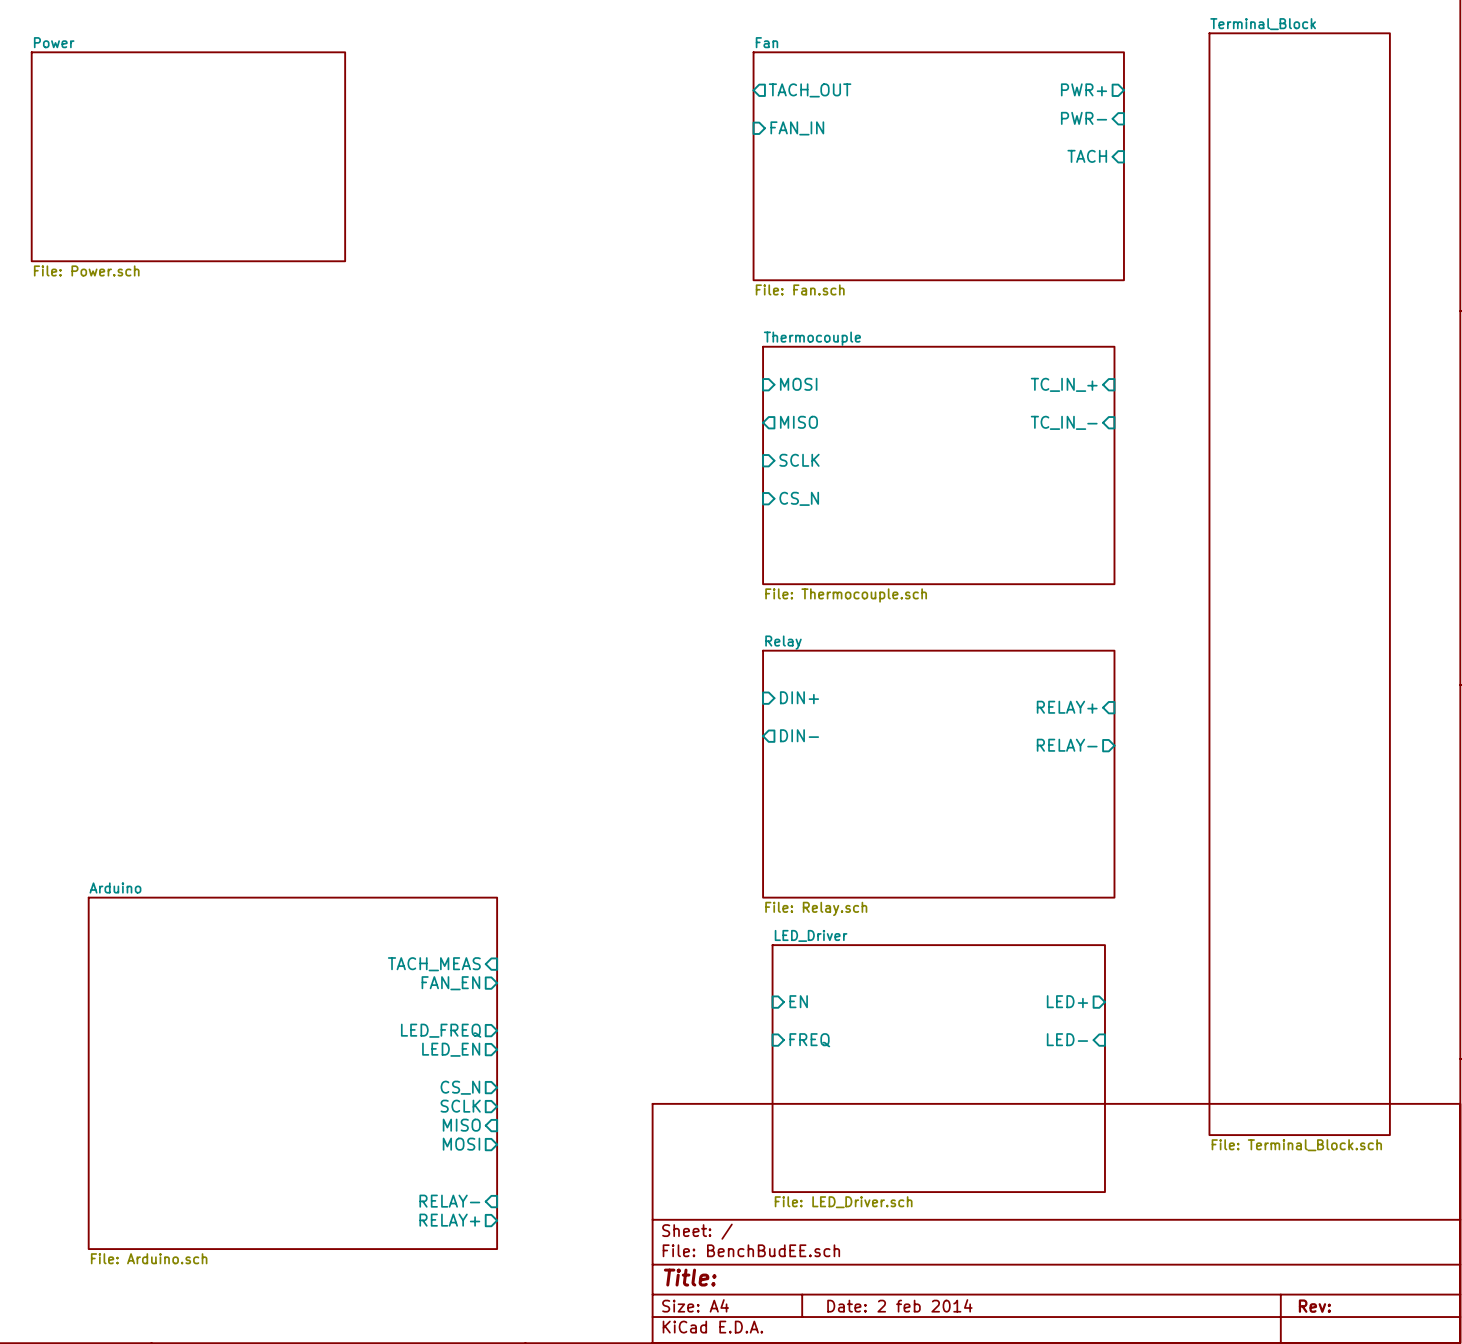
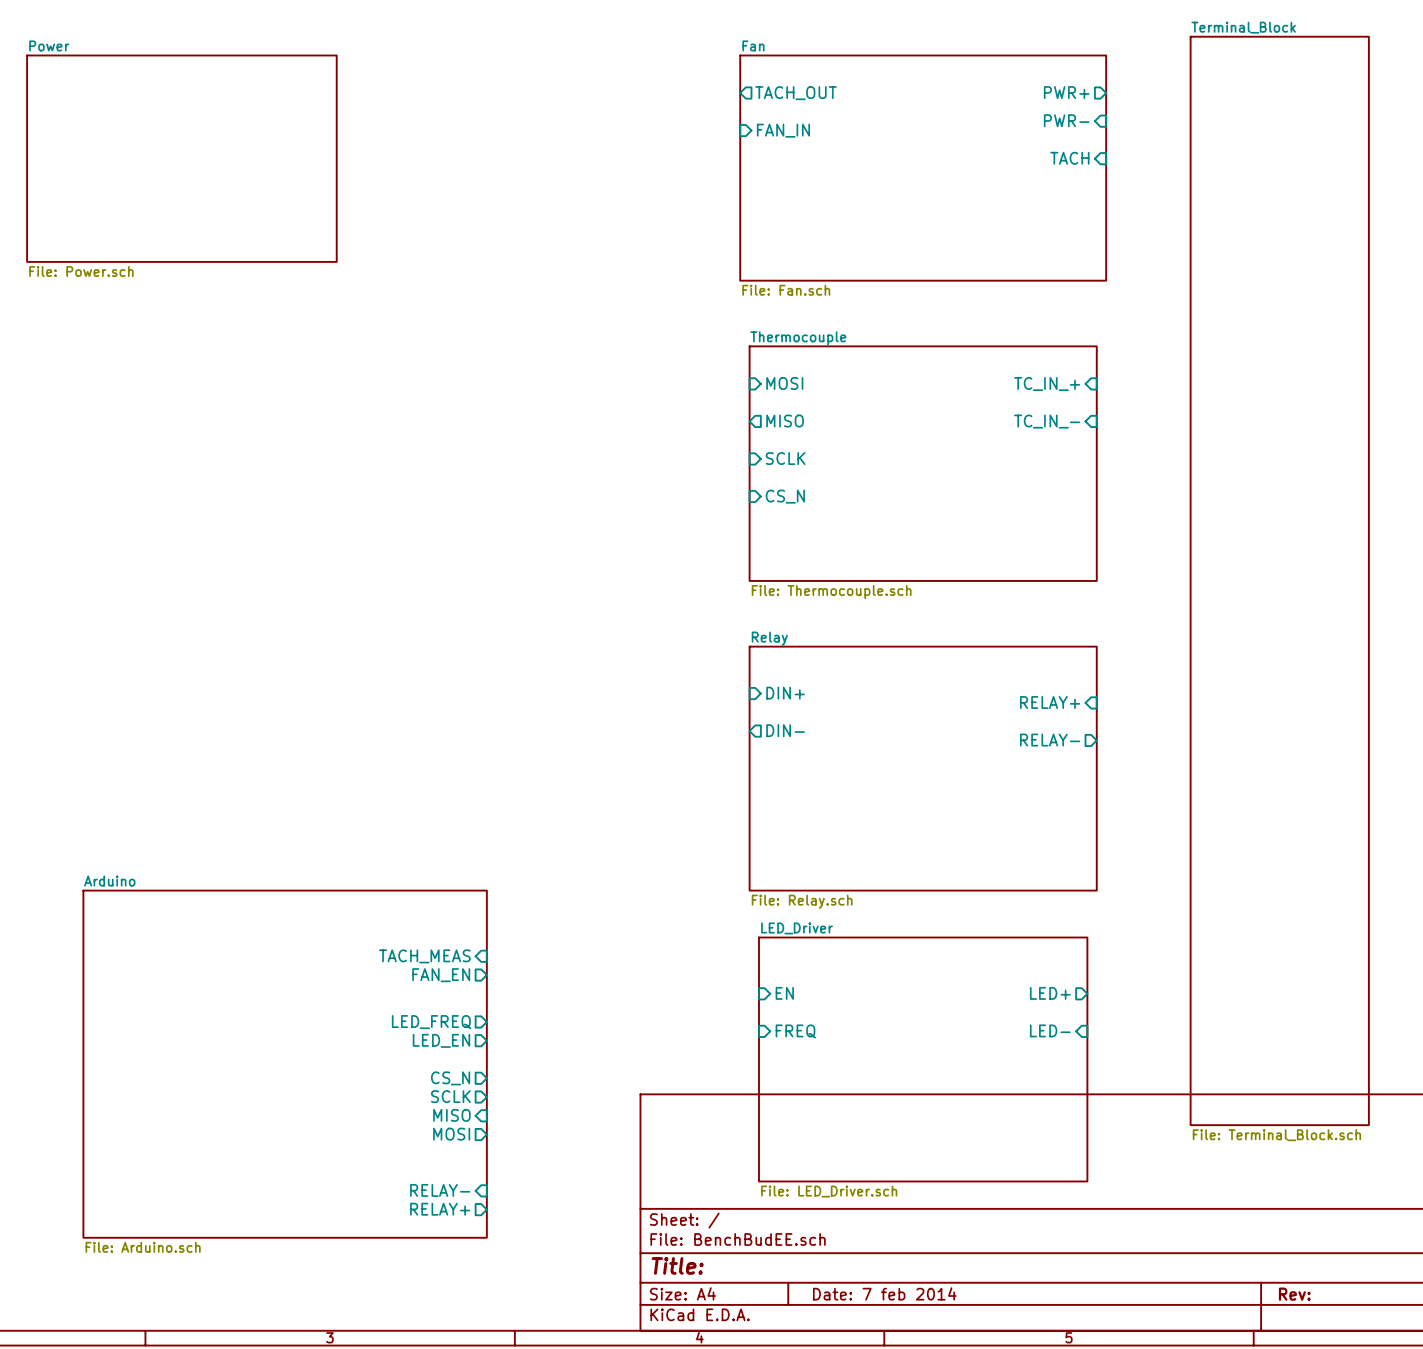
title block: Date: 2 feb 2014 (899, 1305) -> Date: 7 feb 2014 (884, 1293)

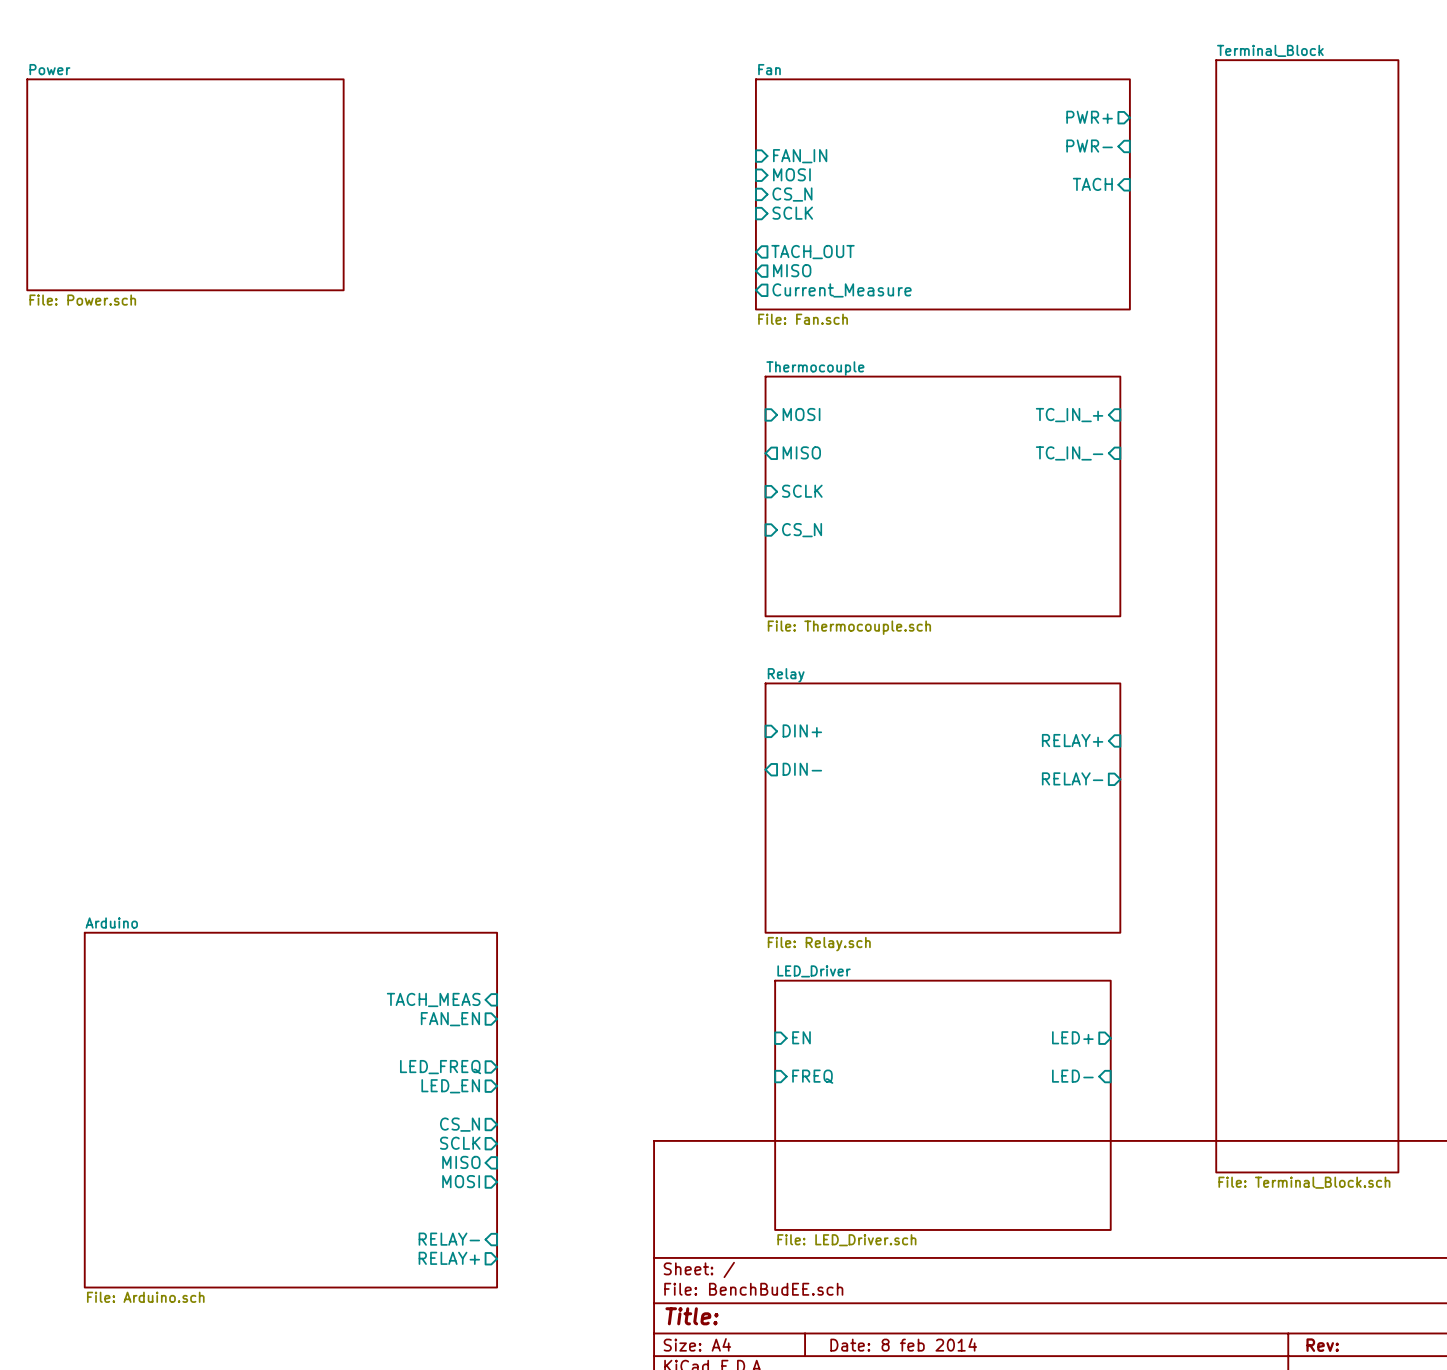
sheet pin position: TACH_OUT (796, 93) -> TACH_OUT (813, 252)
sheet pin: none -> MOSI (791, 174)
sheet pin: none -> CS_N (792, 194)
sheet pin: none -> SCLK (792, 213)
sheet pin: none -> MISO (792, 270)
sheet pin: none -> Current_Measure (842, 290)
title block: Date: 7 feb 2014 (884, 1293) -> Date: 8 feb 2014 (903, 1344)

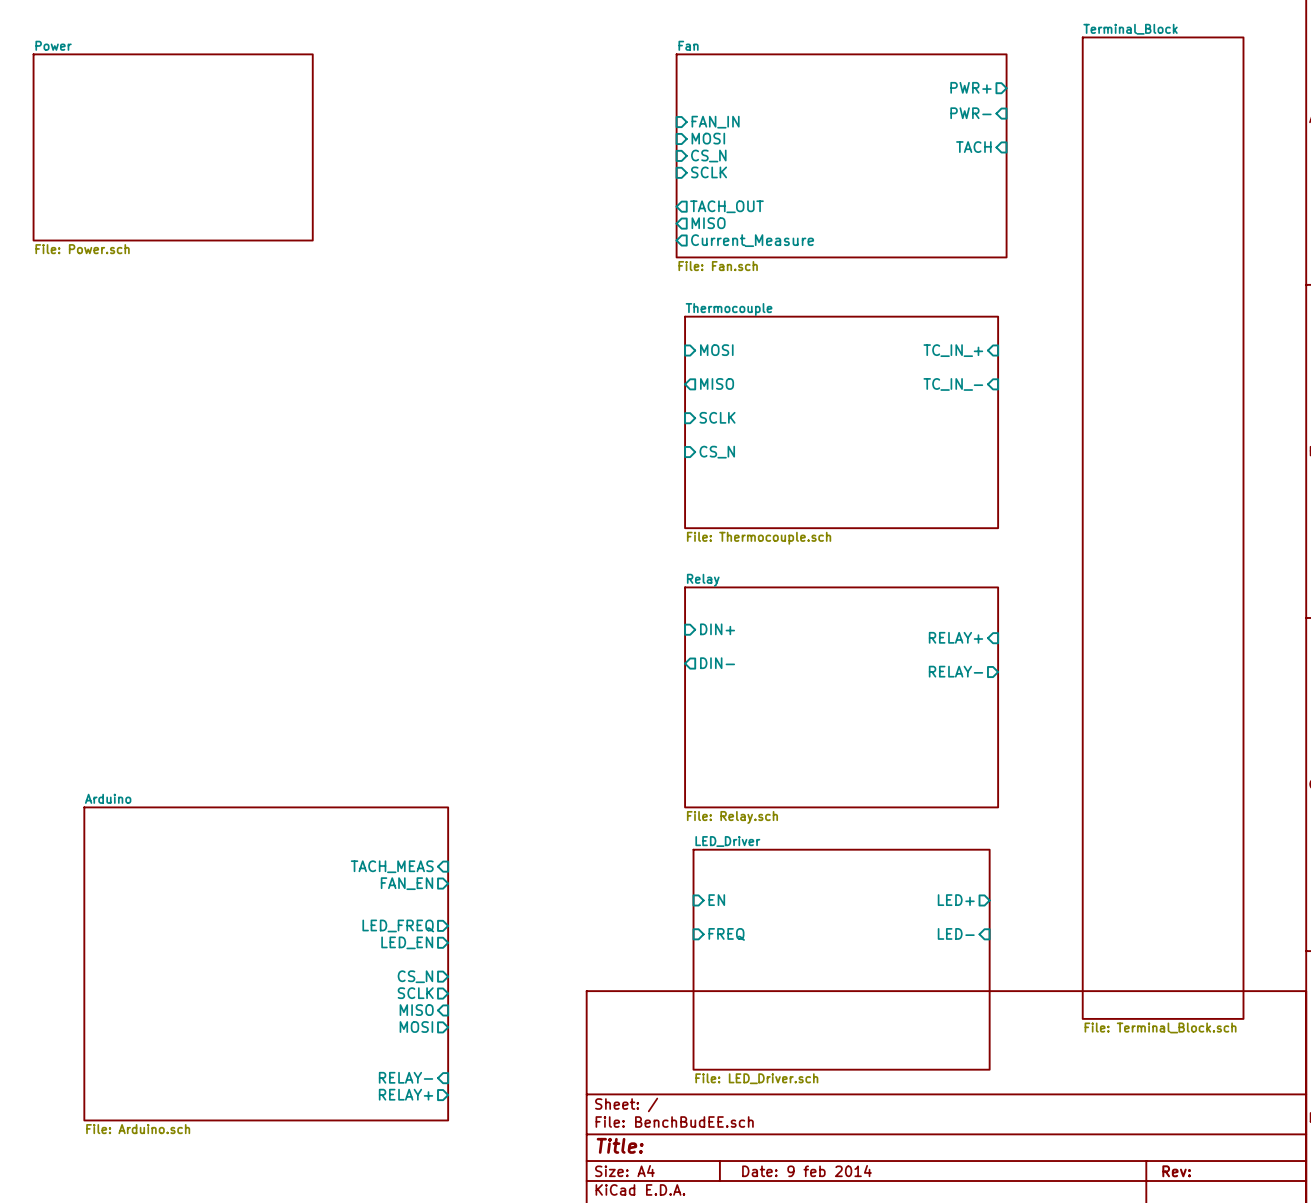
title block: Date: 8 feb 2014 (903, 1344) -> Date: 9 feb 2014 (806, 1171)

